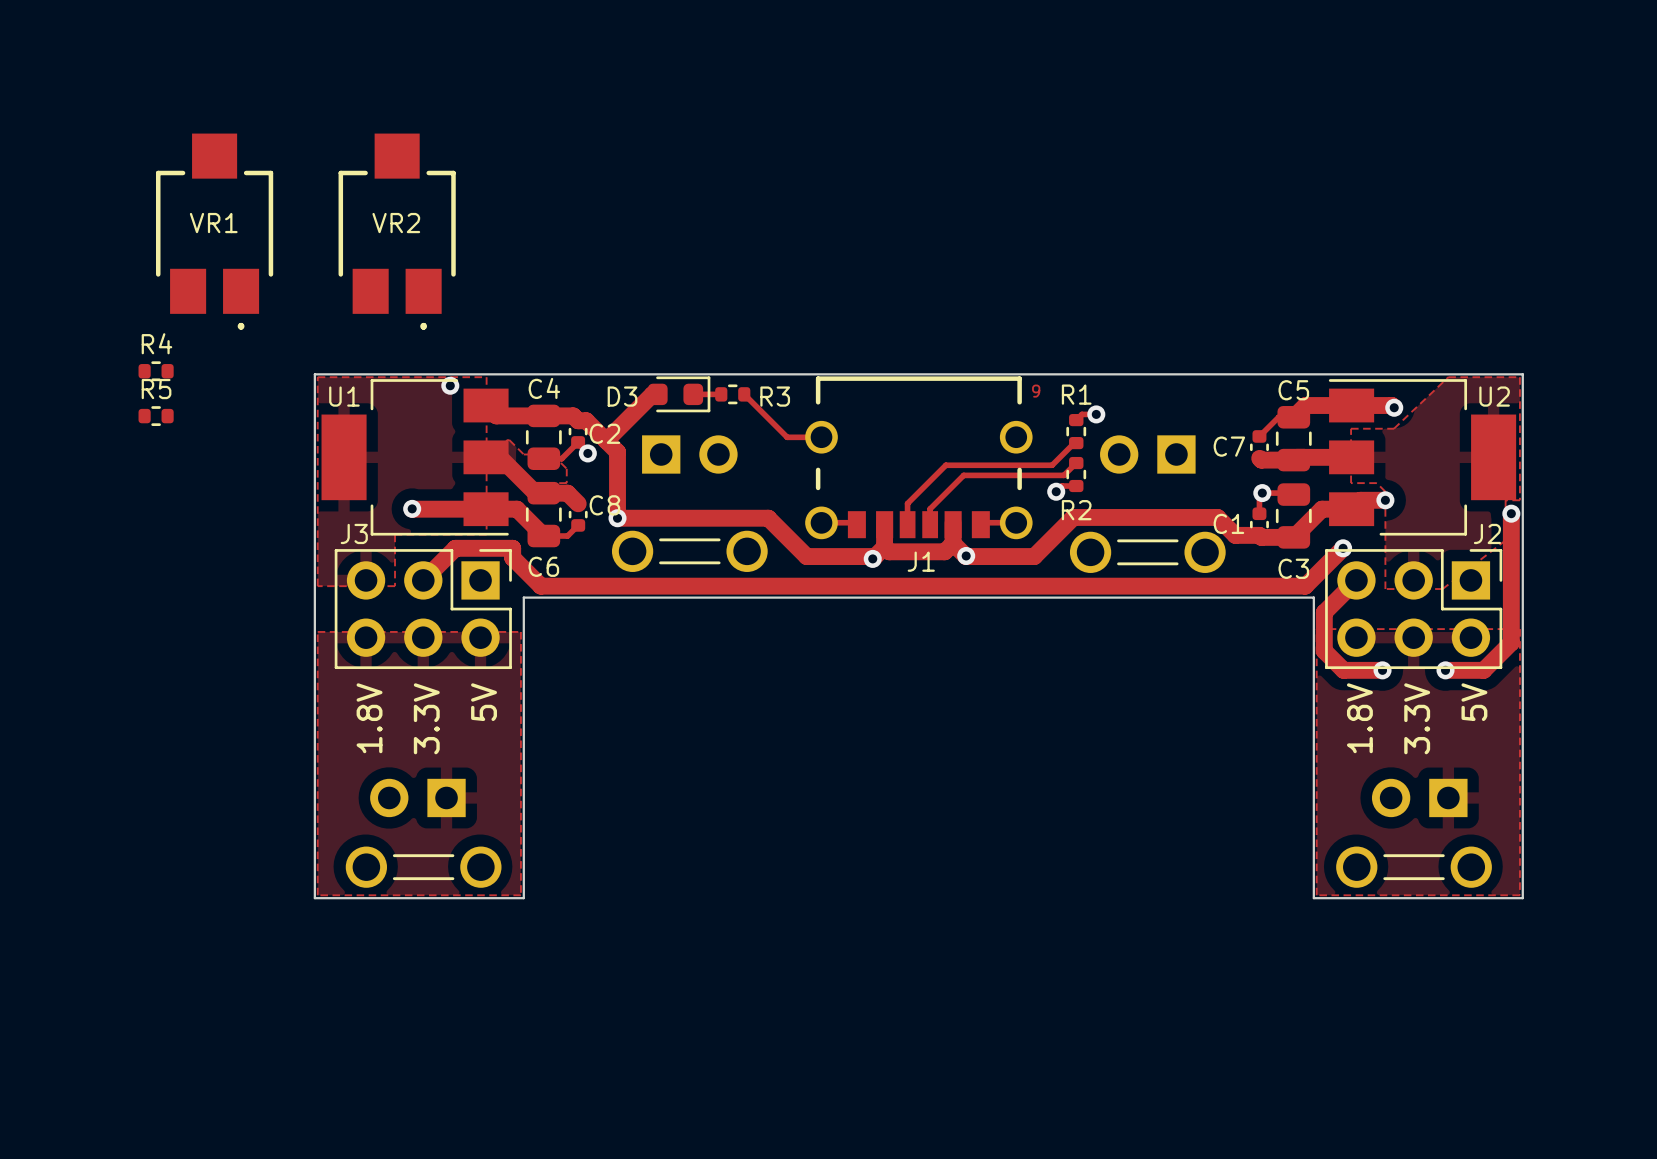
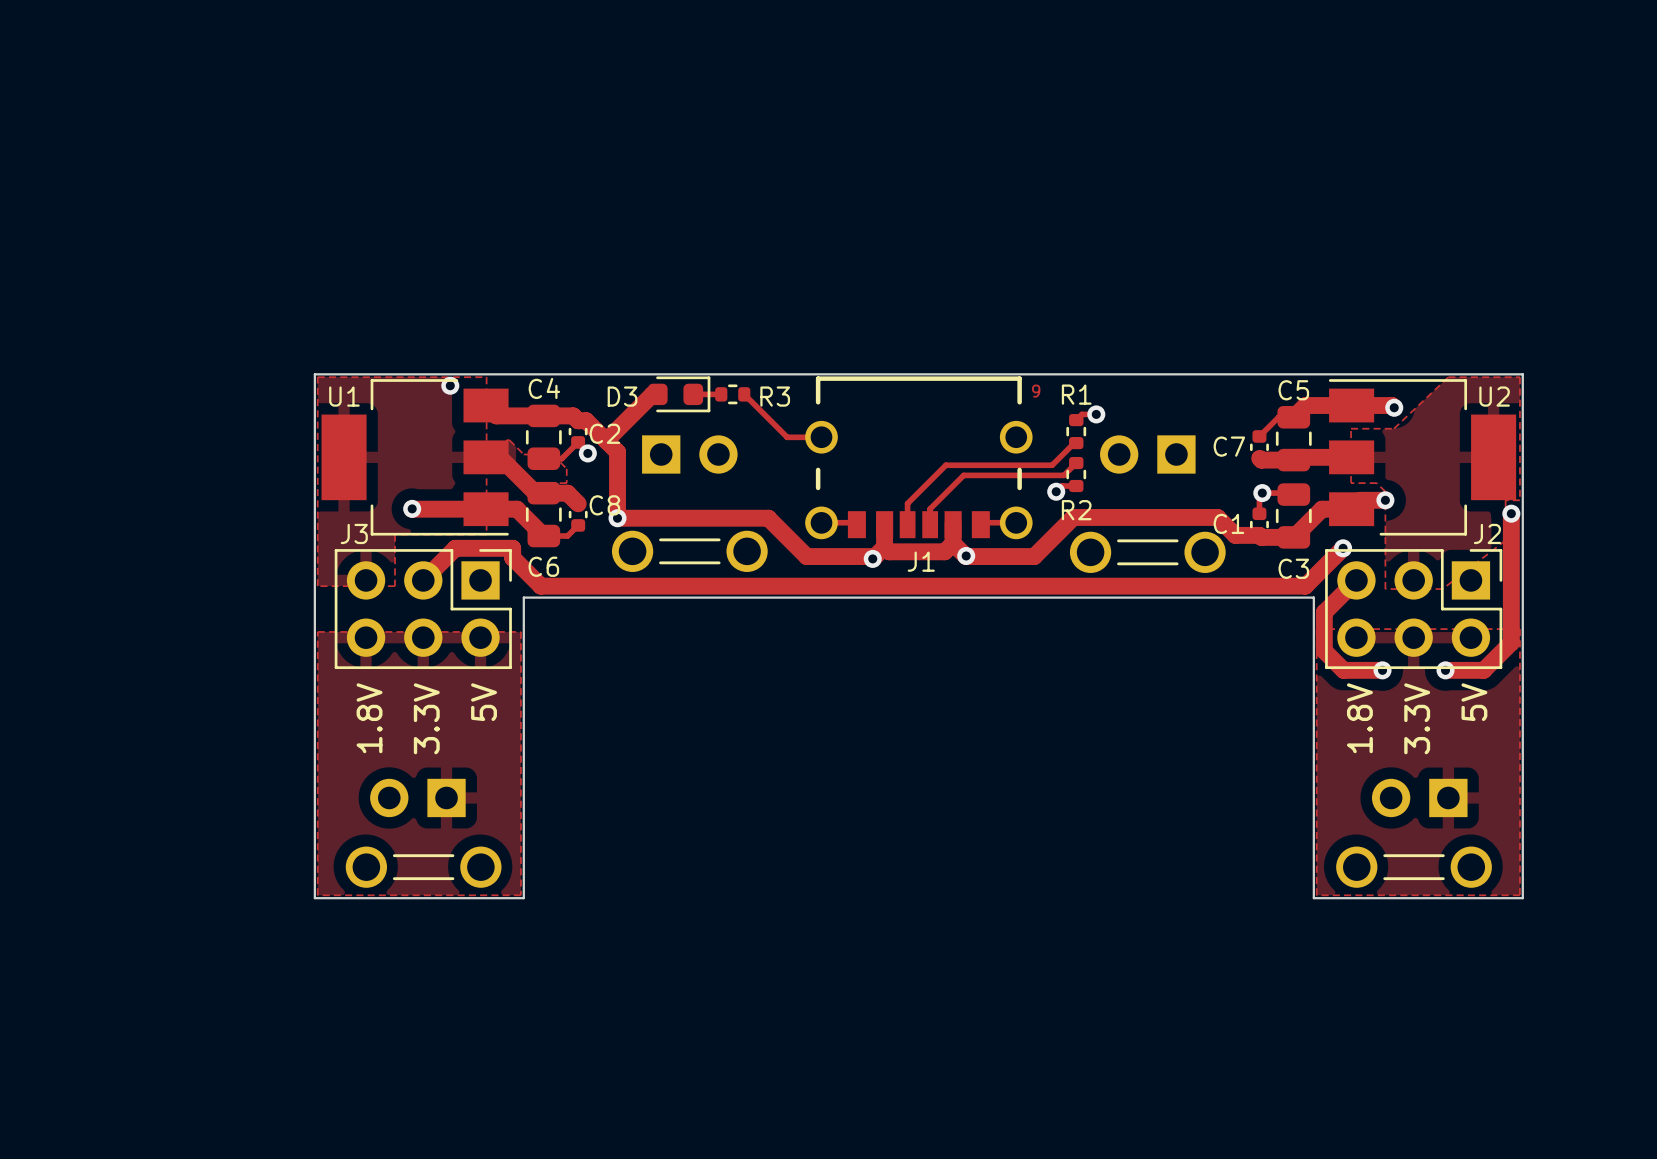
VR1: (214, 231) -> none
VR2: (397, 231) -> none
R4: (156, 371) -> none
R5: (156, 416) -> none

